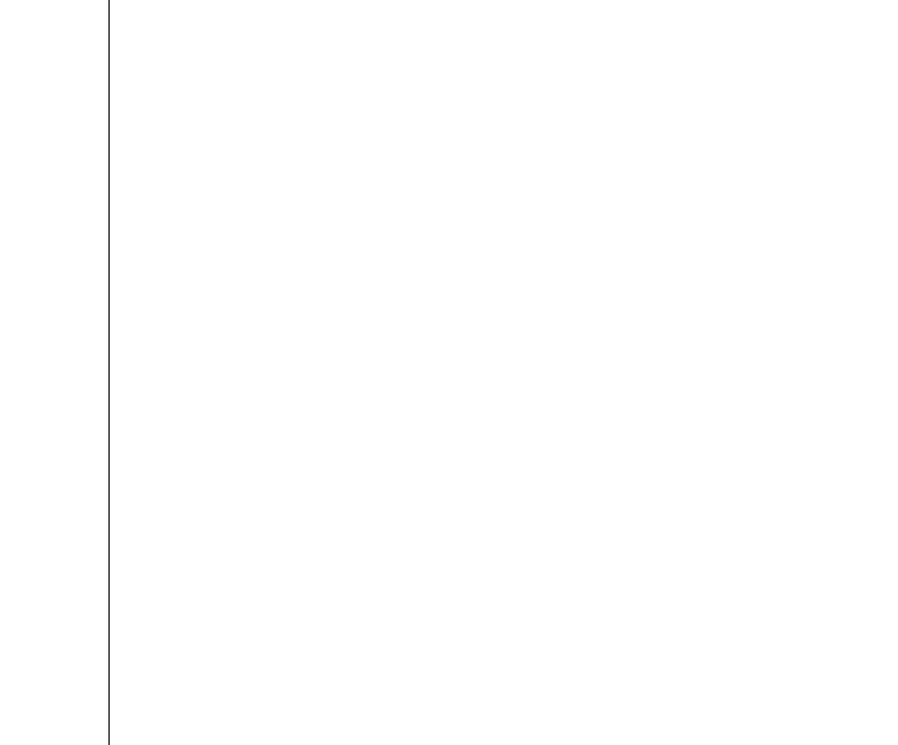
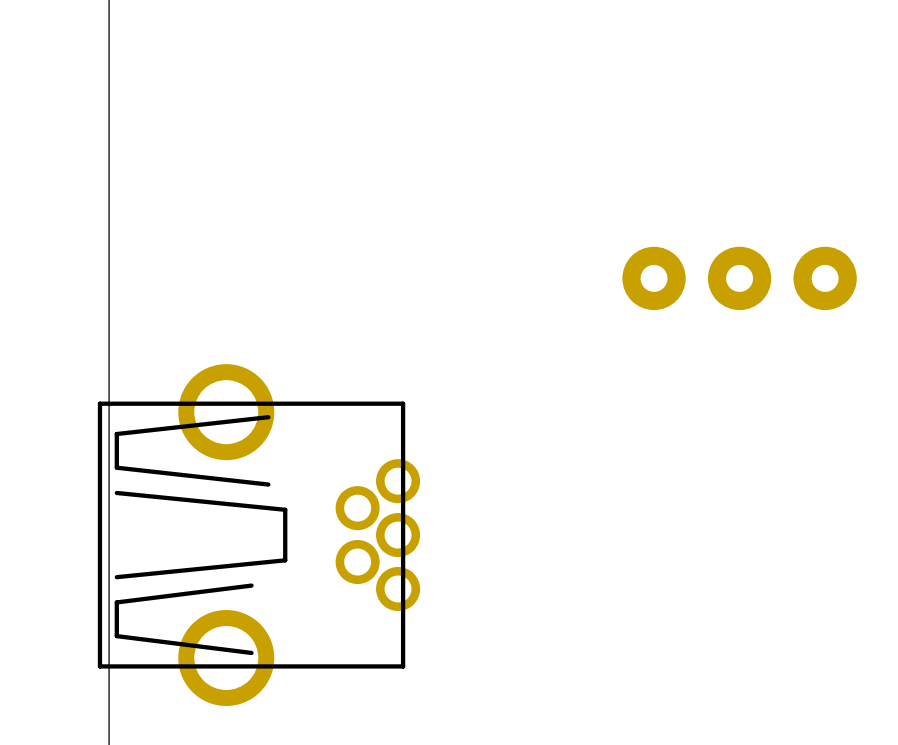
part: none -> (739, 278)
part: none -> (258, 535)

